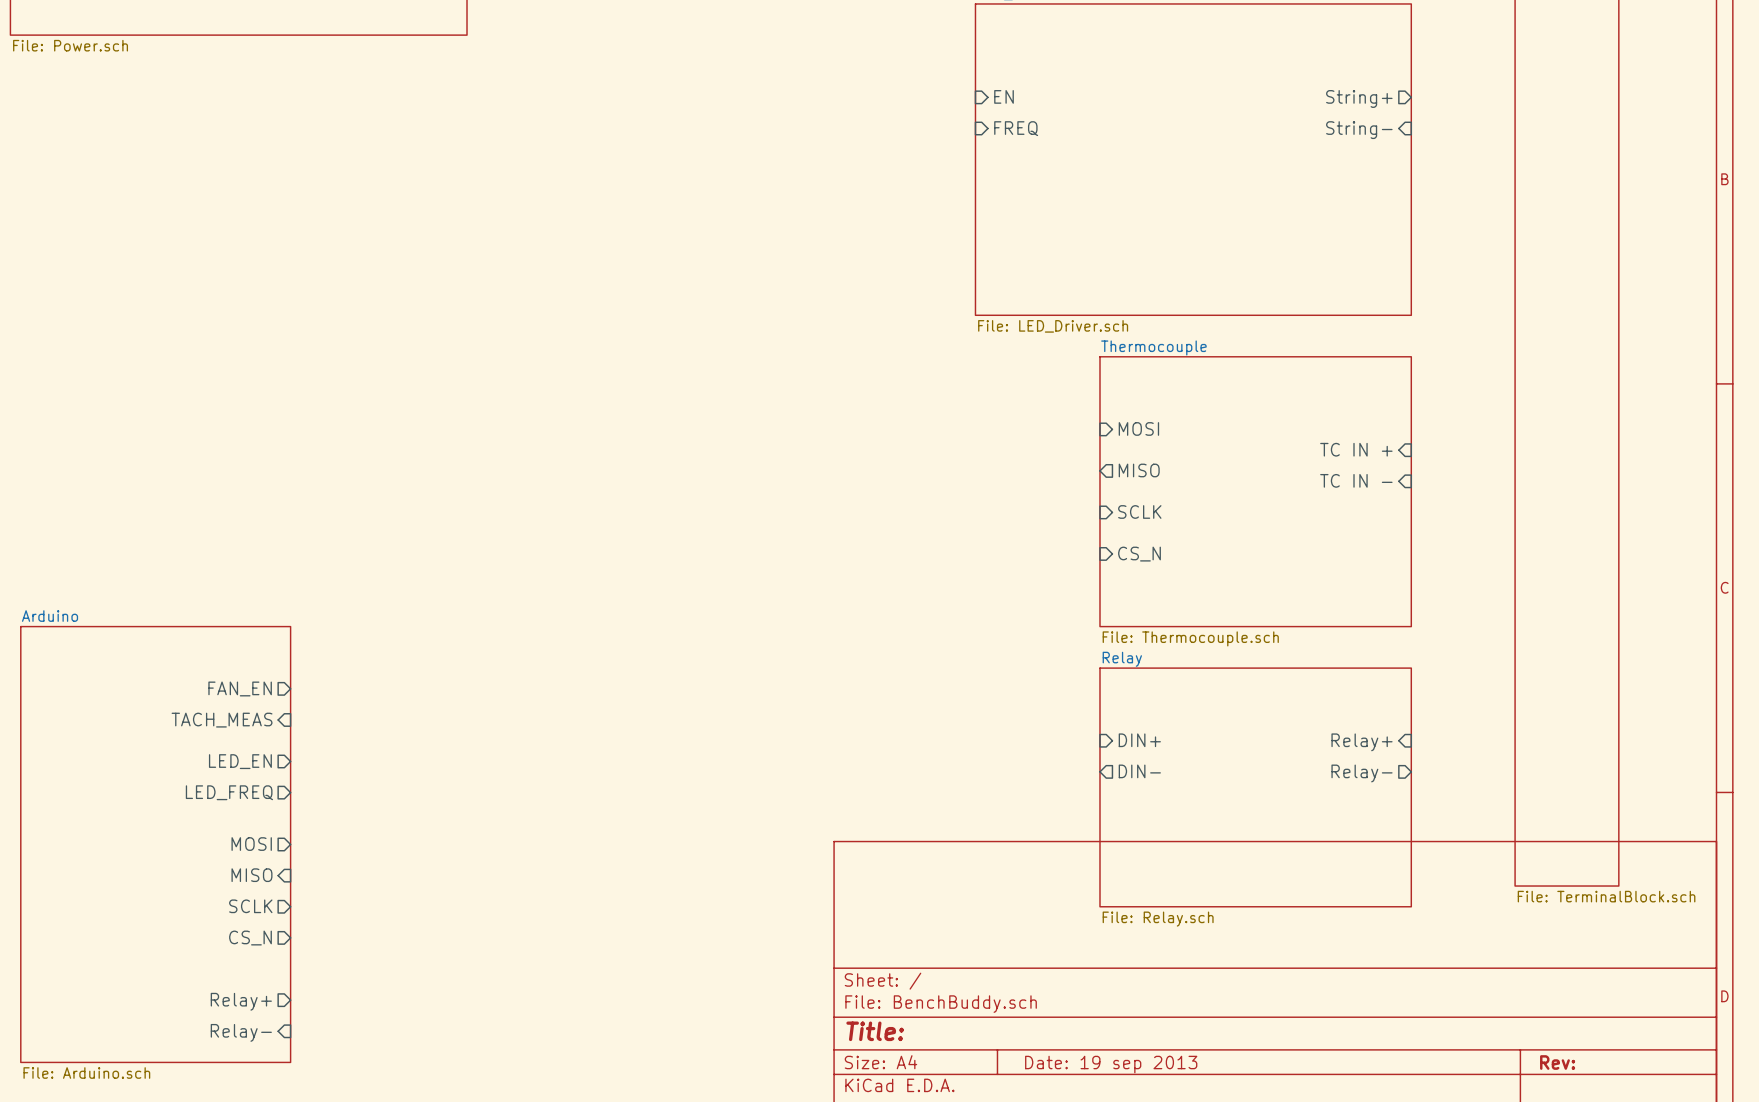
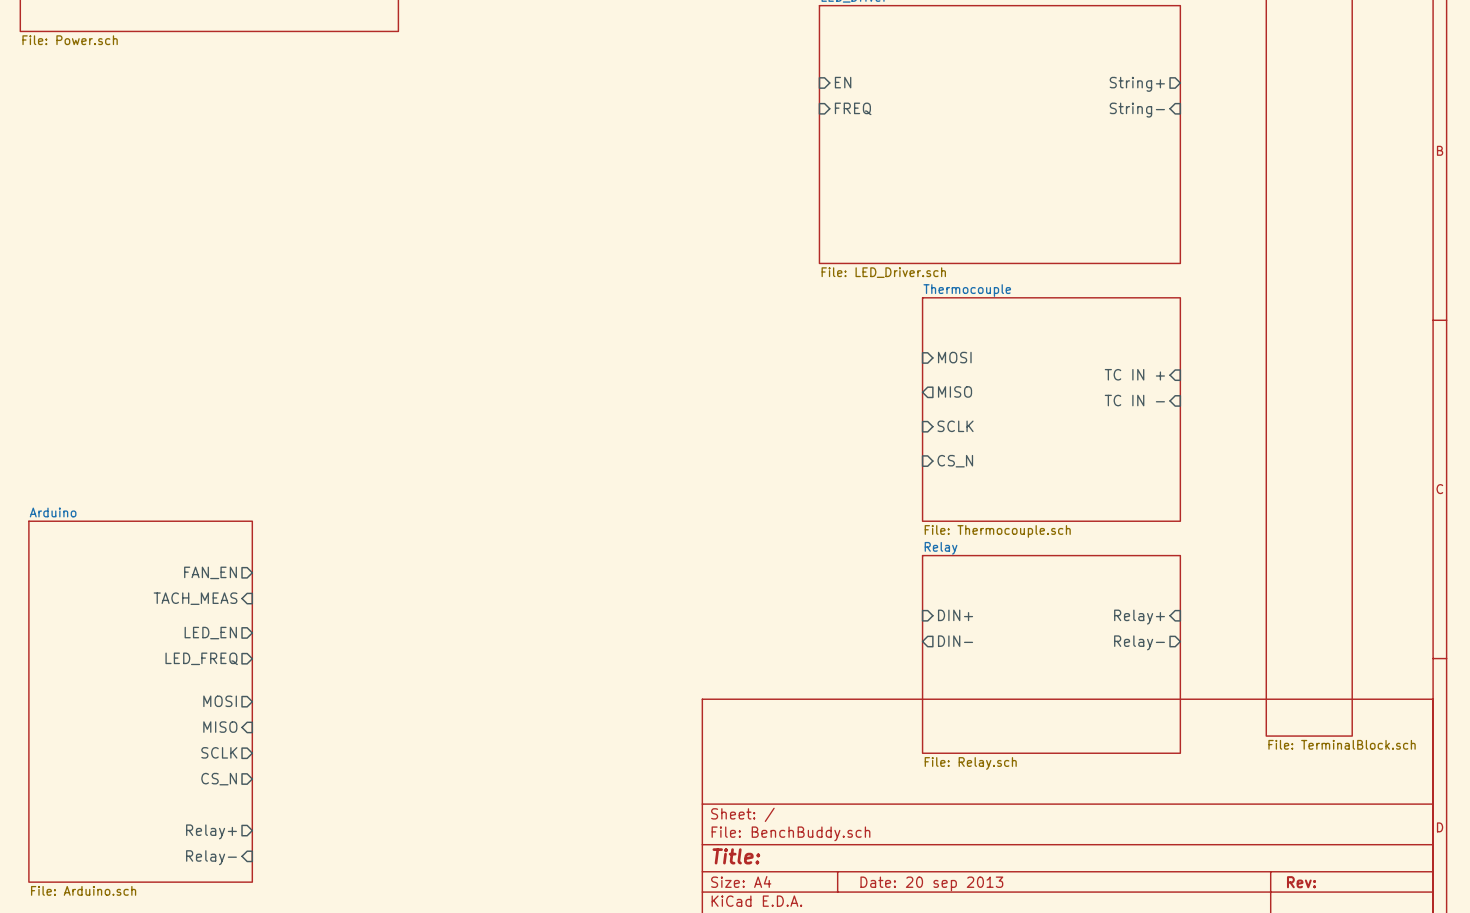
title block: Date: 19 sep 2013 (1111, 1064) -> Date: 20 sep 2013 (931, 883)

